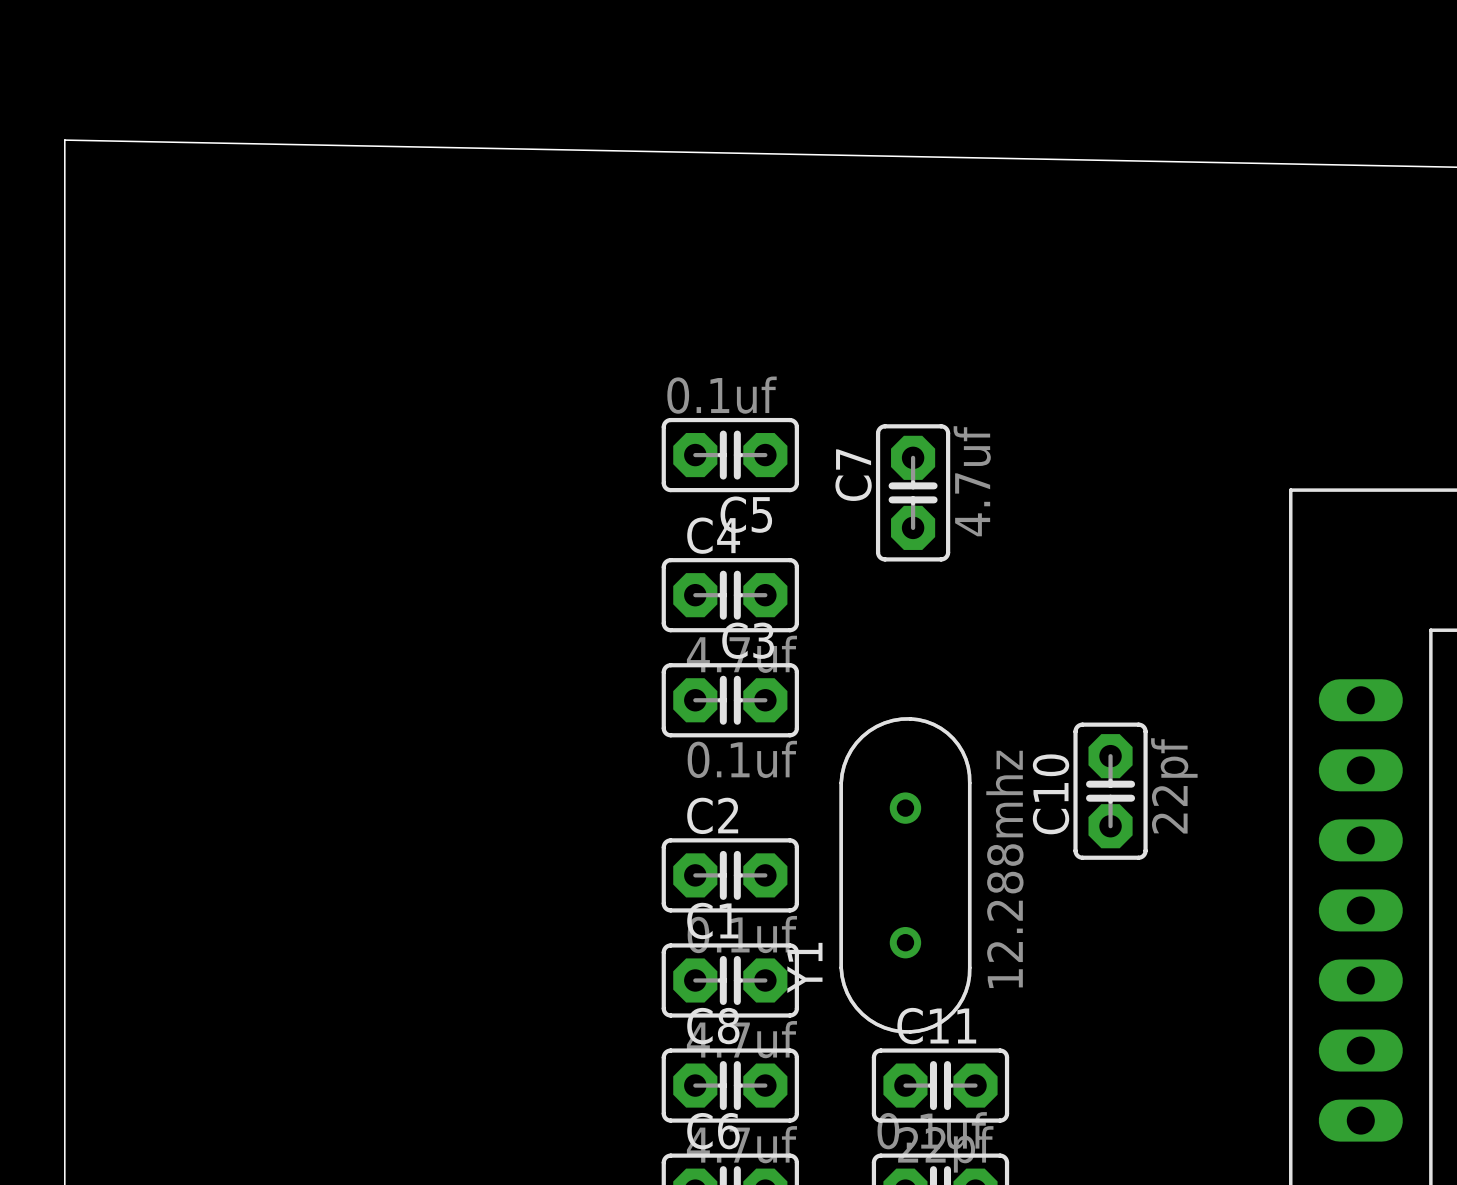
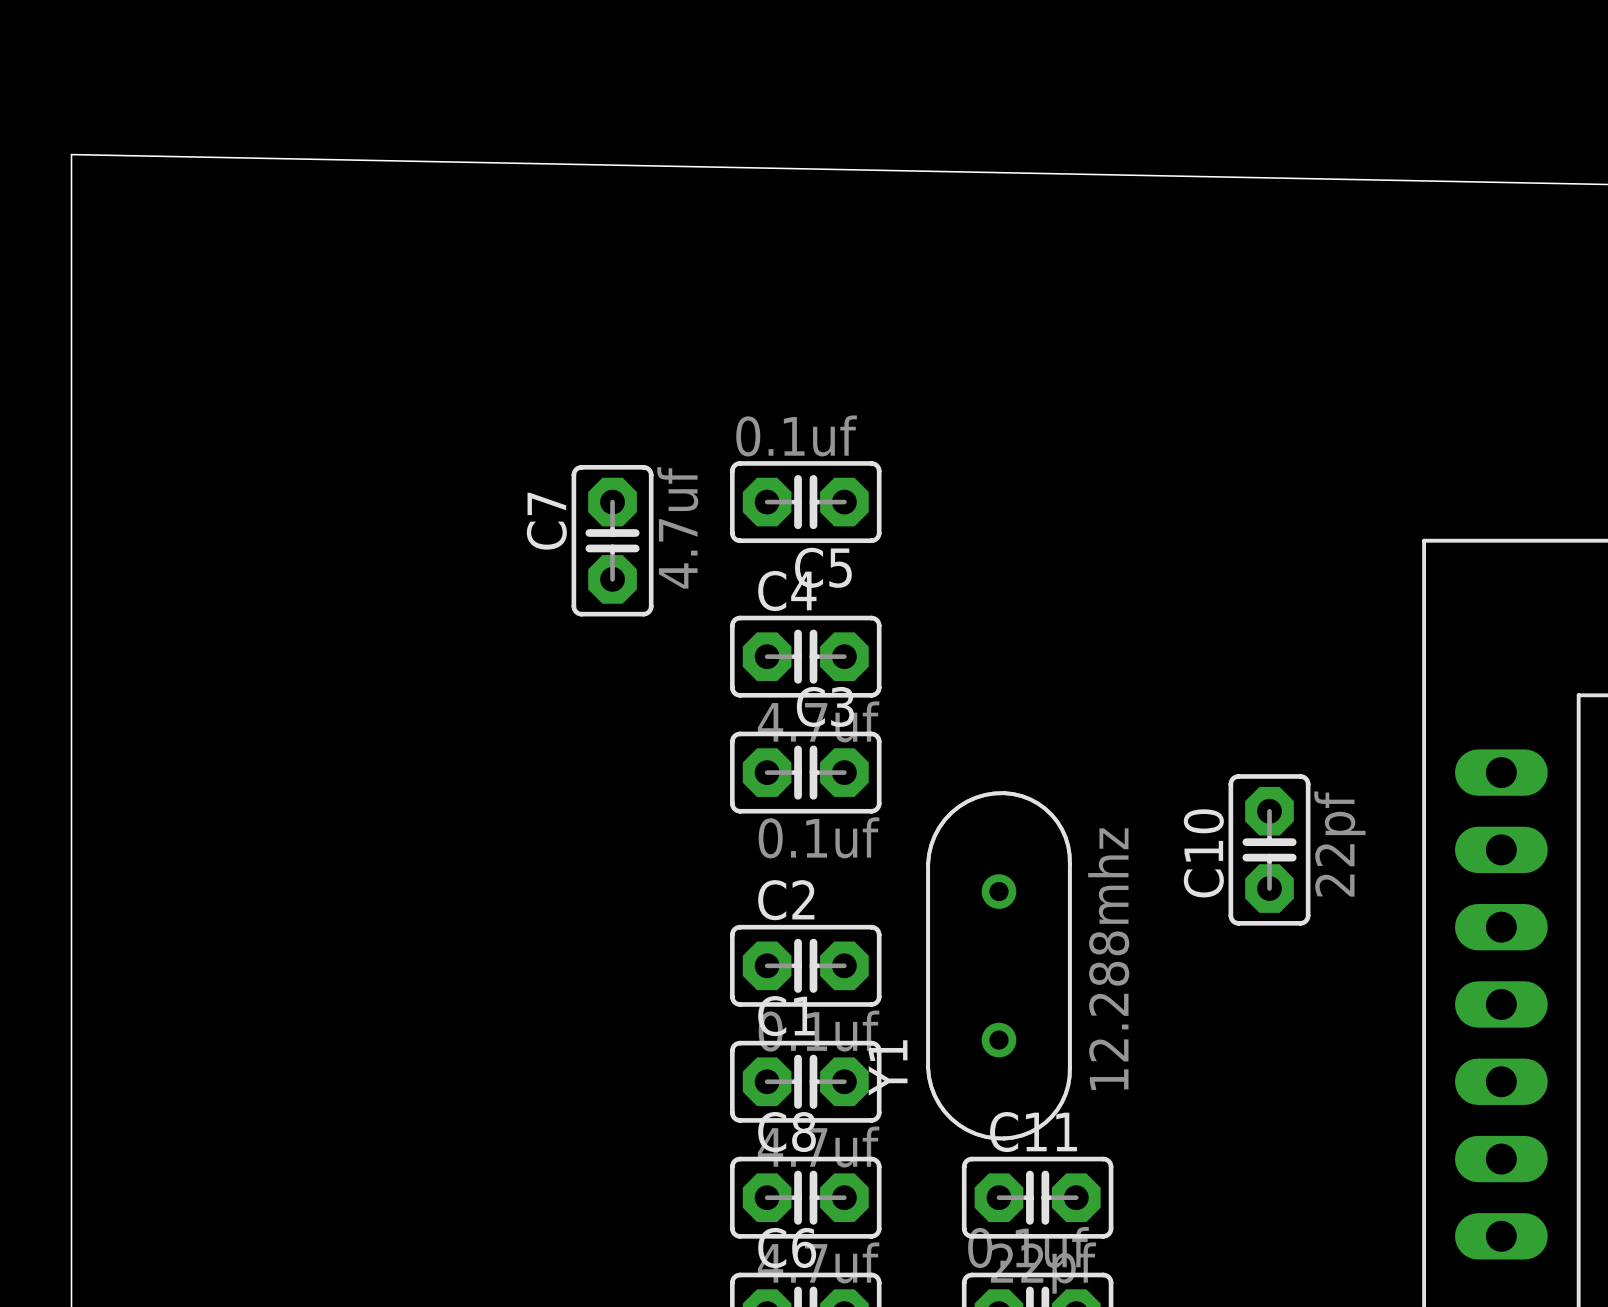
C7 position: (913, 492) -> (612, 540)
C10 position: (1110, 791) -> (1269, 849)

